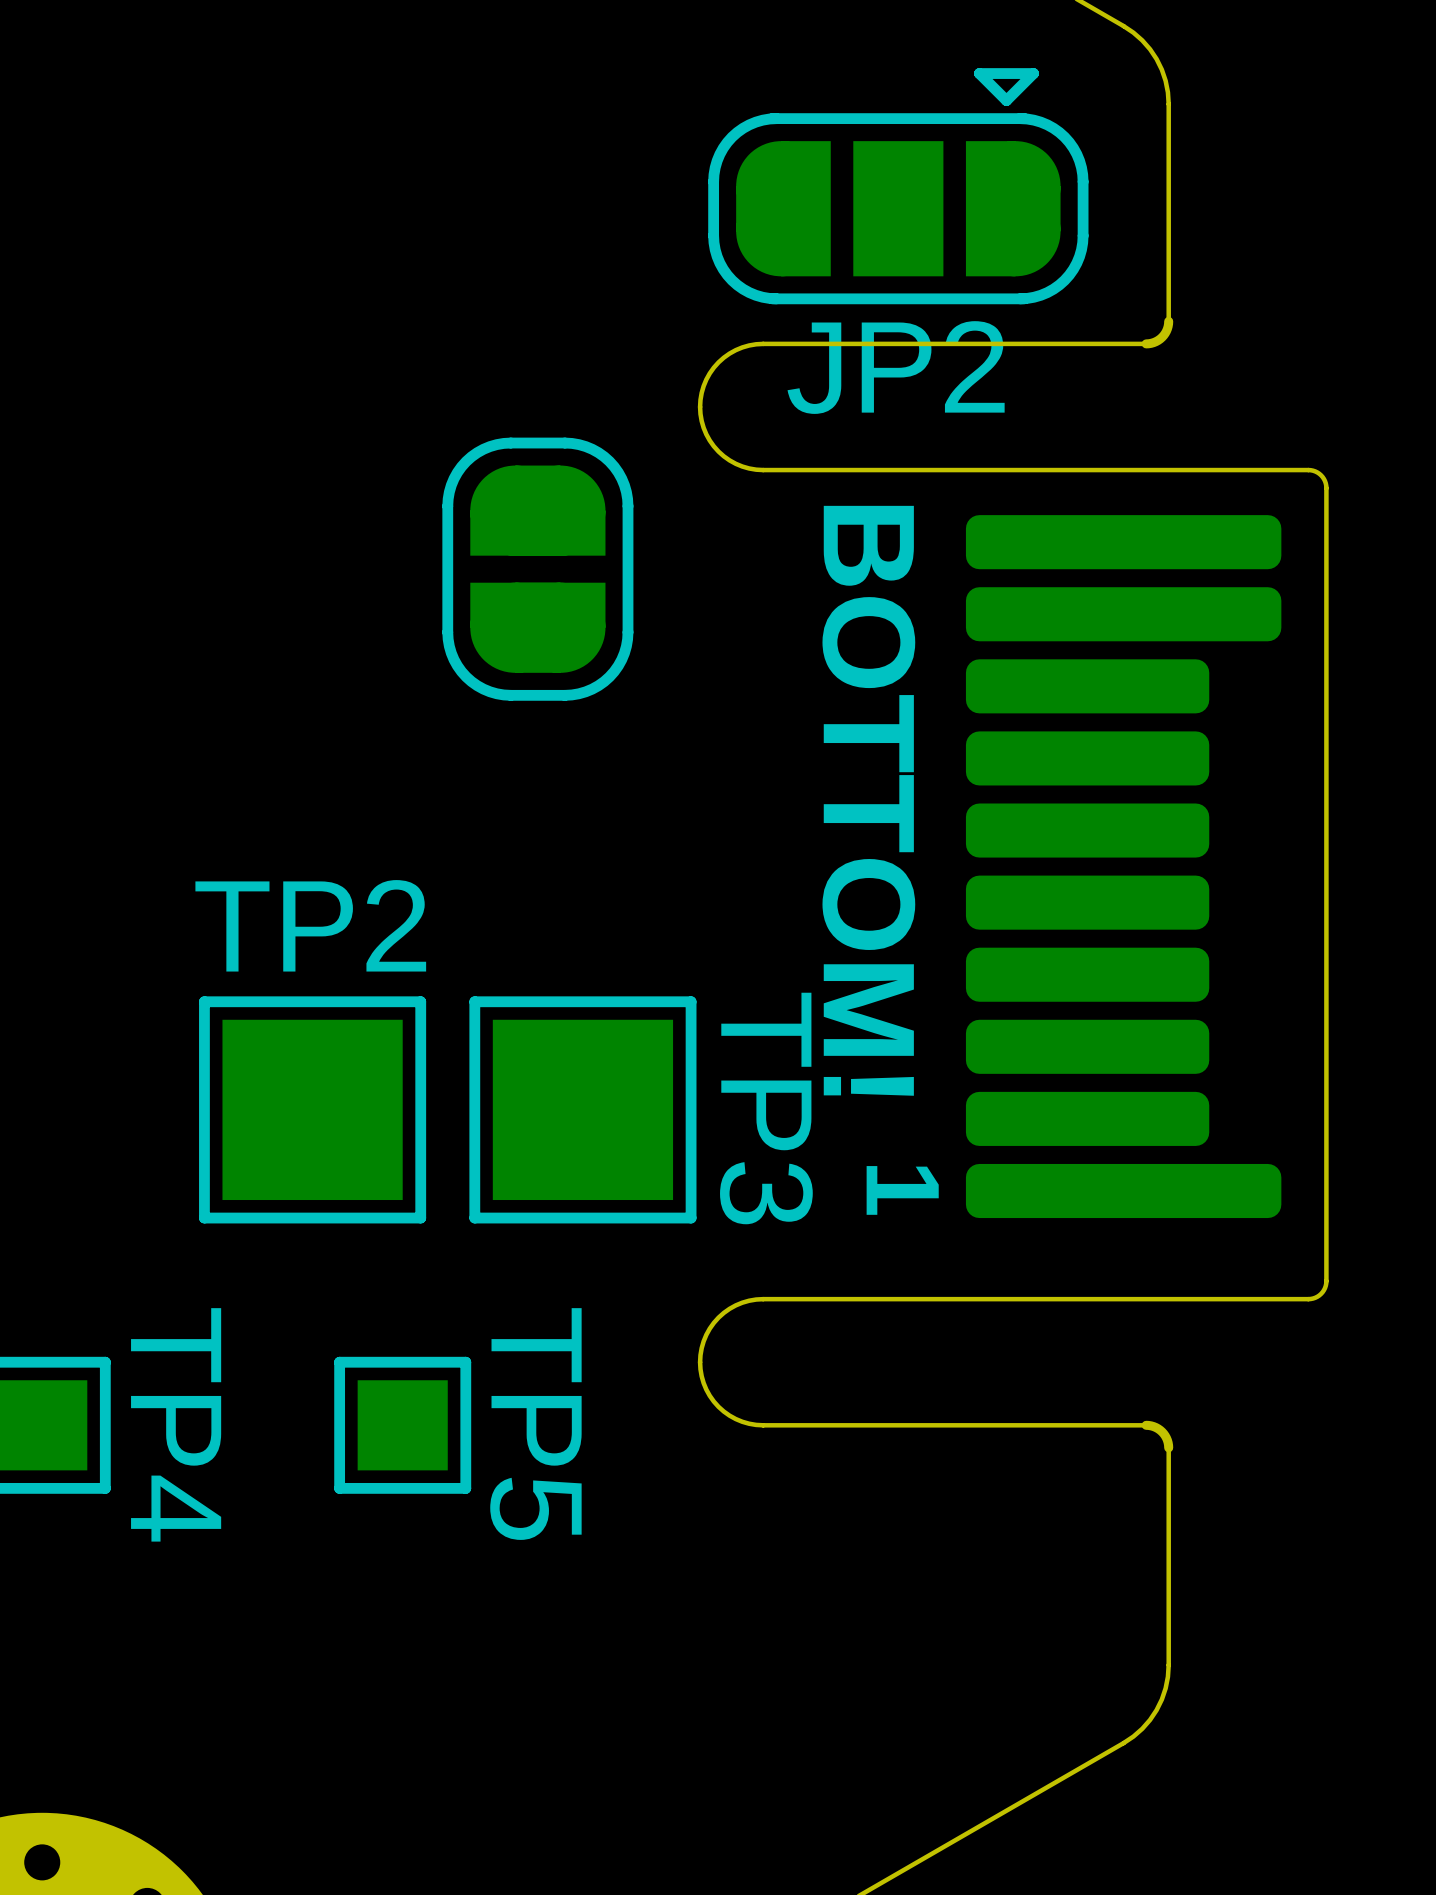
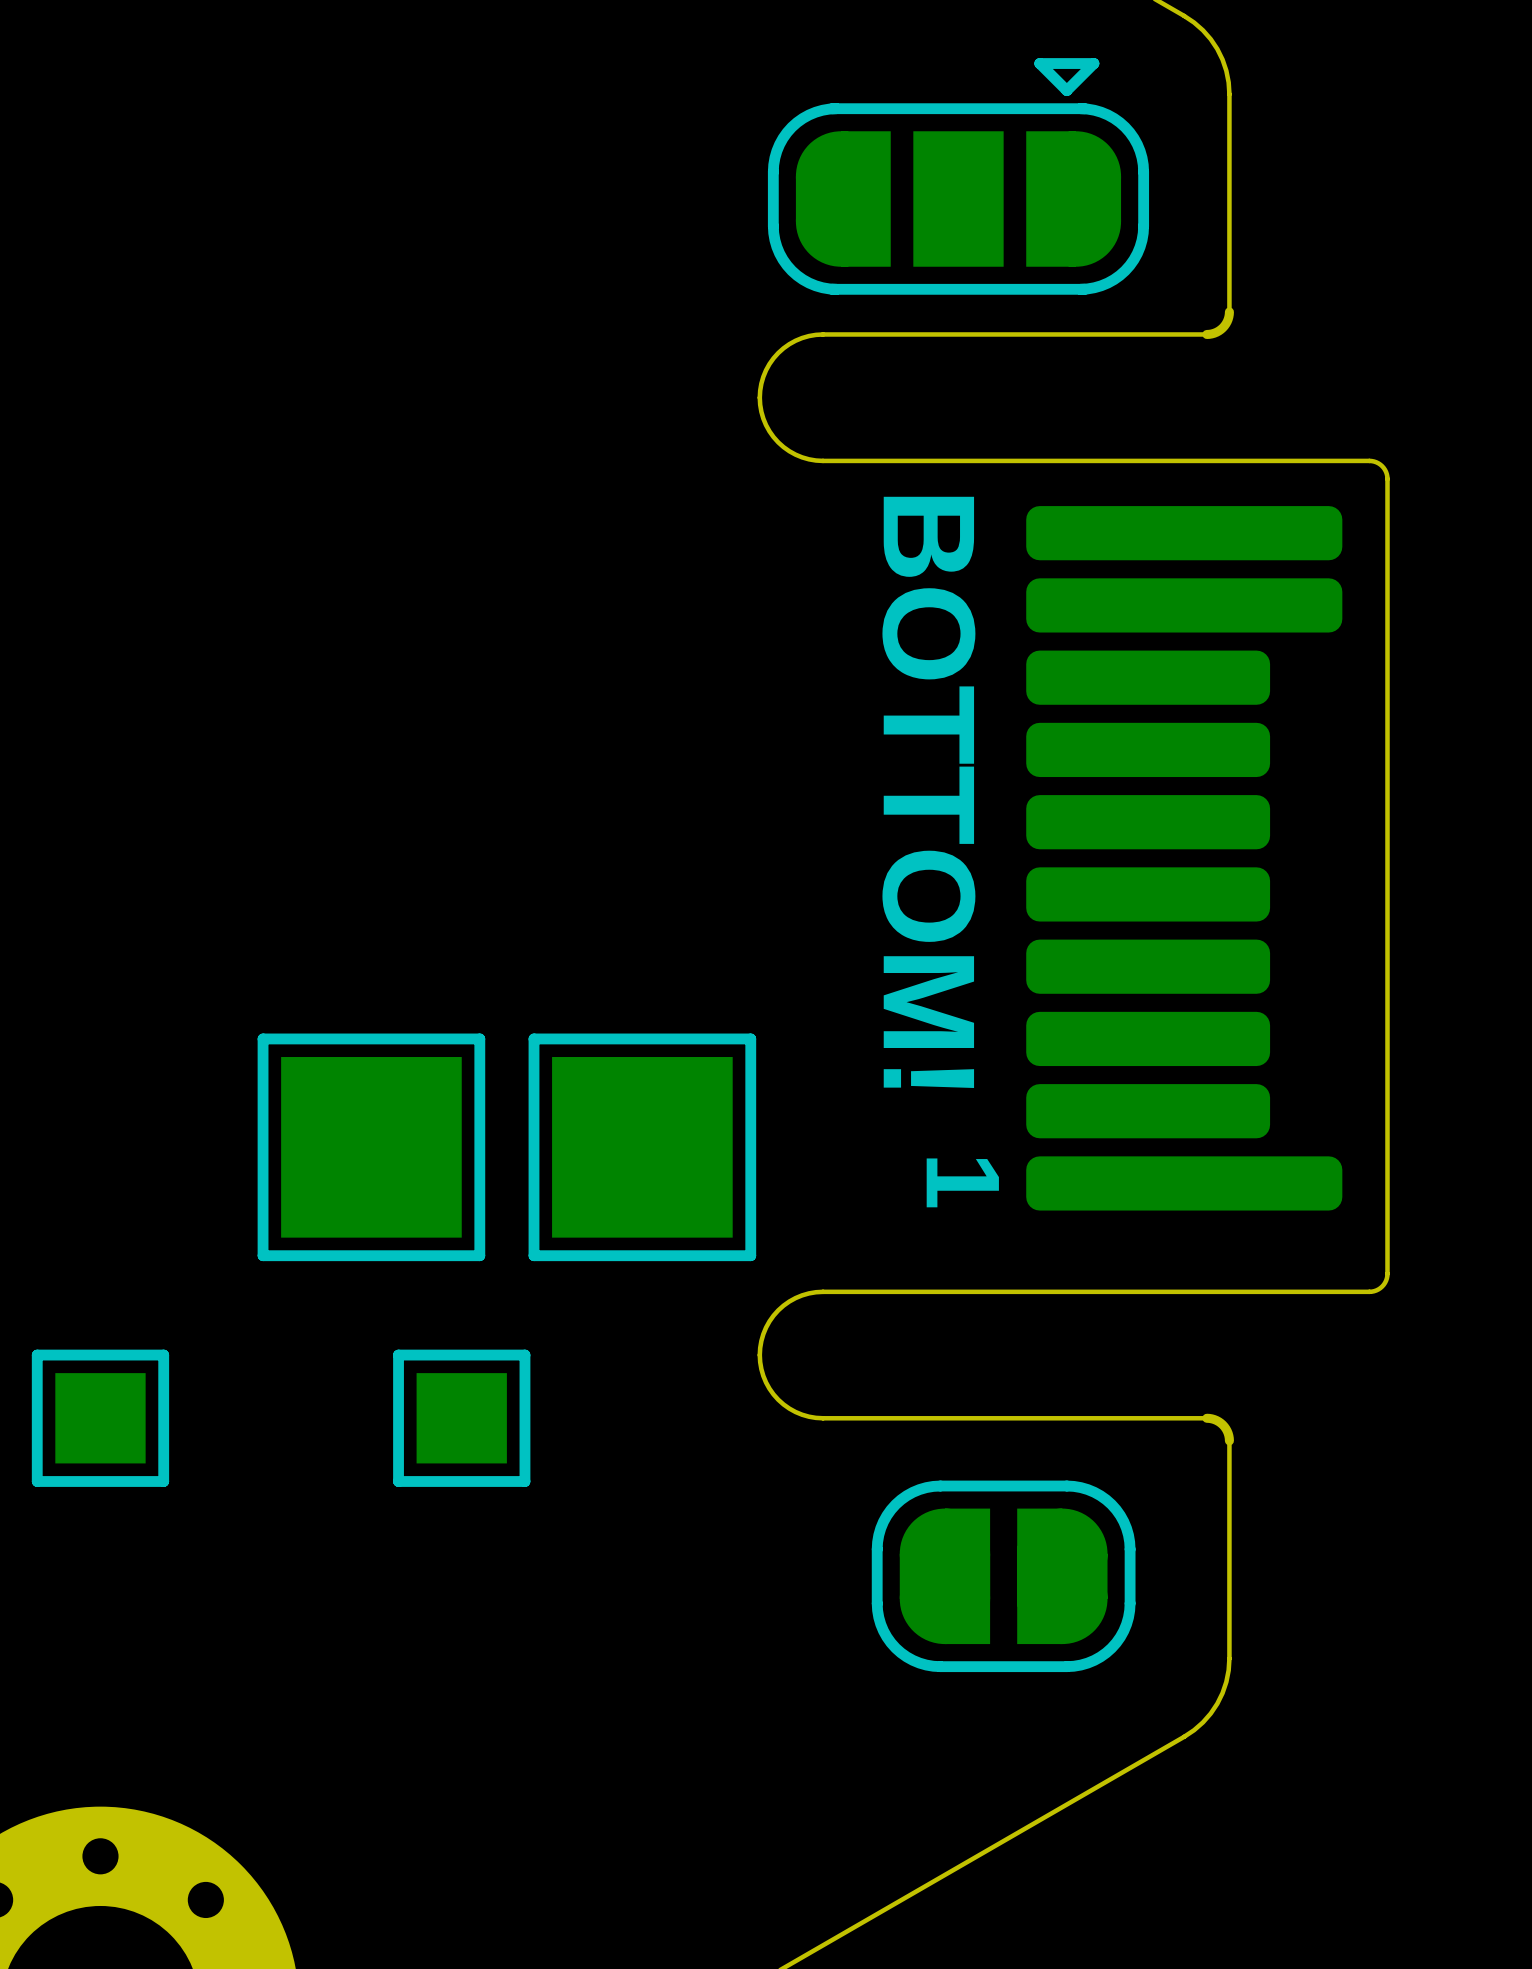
JP2 name: JP2 (896, 367) -> none
part rotation: 0° (537, 569) -> 90° clockwise (1003, 1576)
part position: (537, 569) -> (1003, 1576)
TP2 name: TP2 (310, 925) -> none
TP3 name: TP3 (766, 1108) -> none
TP2 position: (312, 1109) -> (371, 1147)
TP3 position: (582, 1109) -> (642, 1147)
TP4 name: TP4 (176, 1424) -> none
TP5 name: TP5 (535, 1424) -> none

